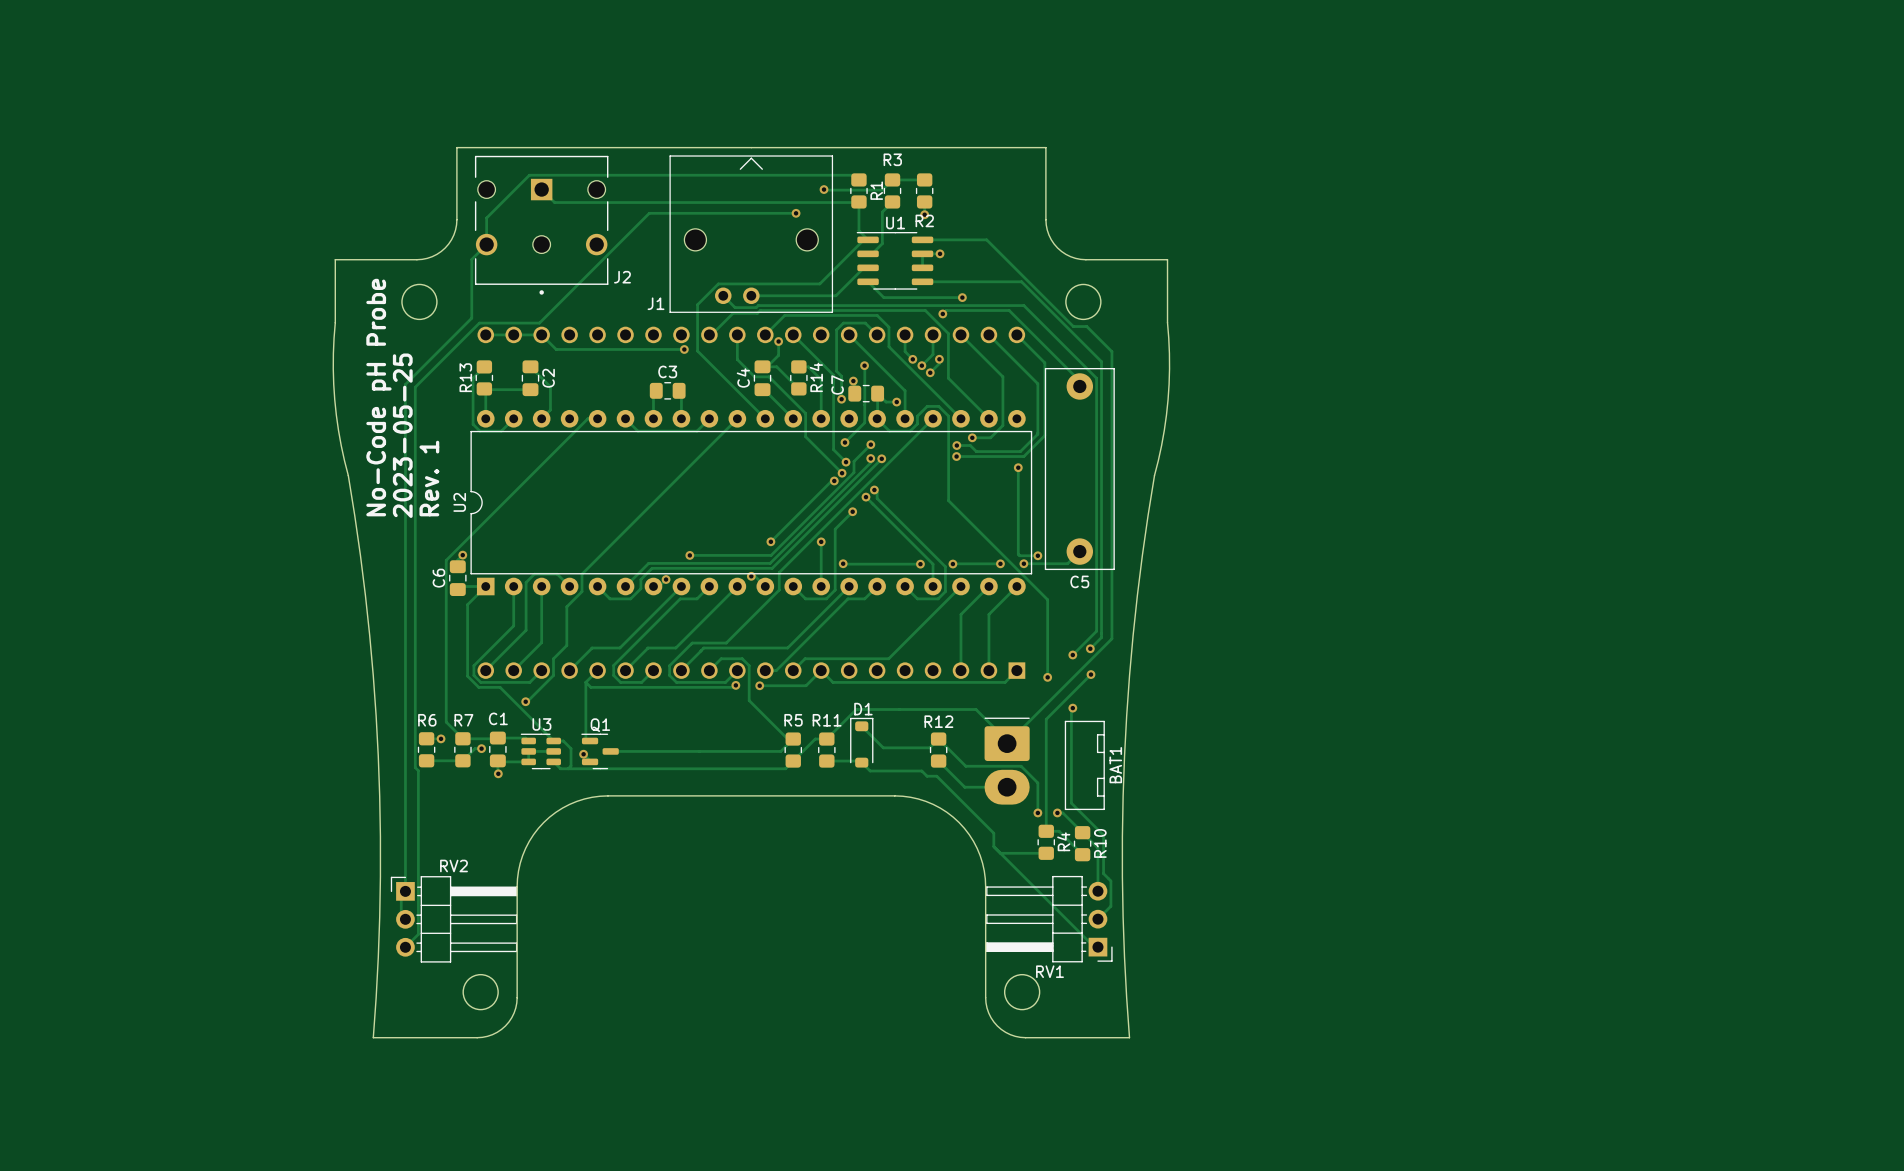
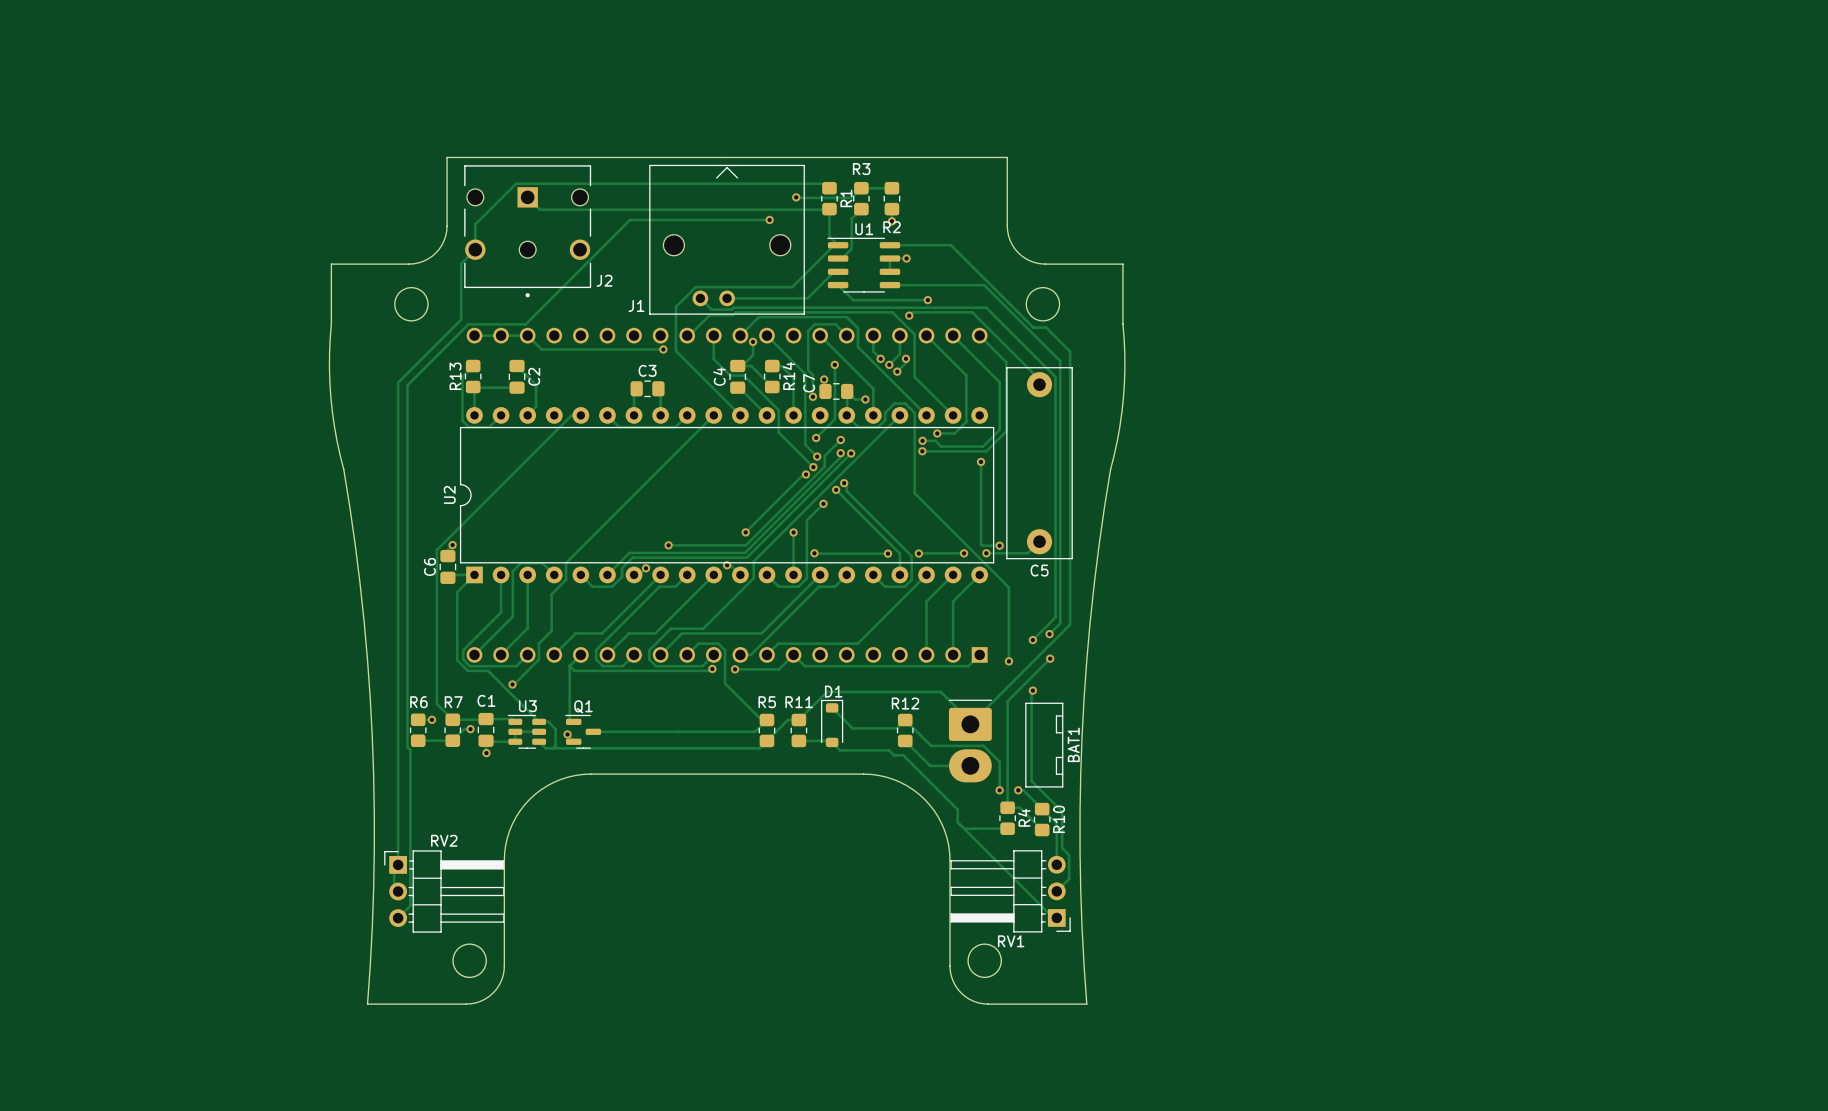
text: No-Code pH Probe (378, 397) -> none
text: 2023-05-25 (402, 435) -> none
text: Rev. 1 (429, 478) -> none

